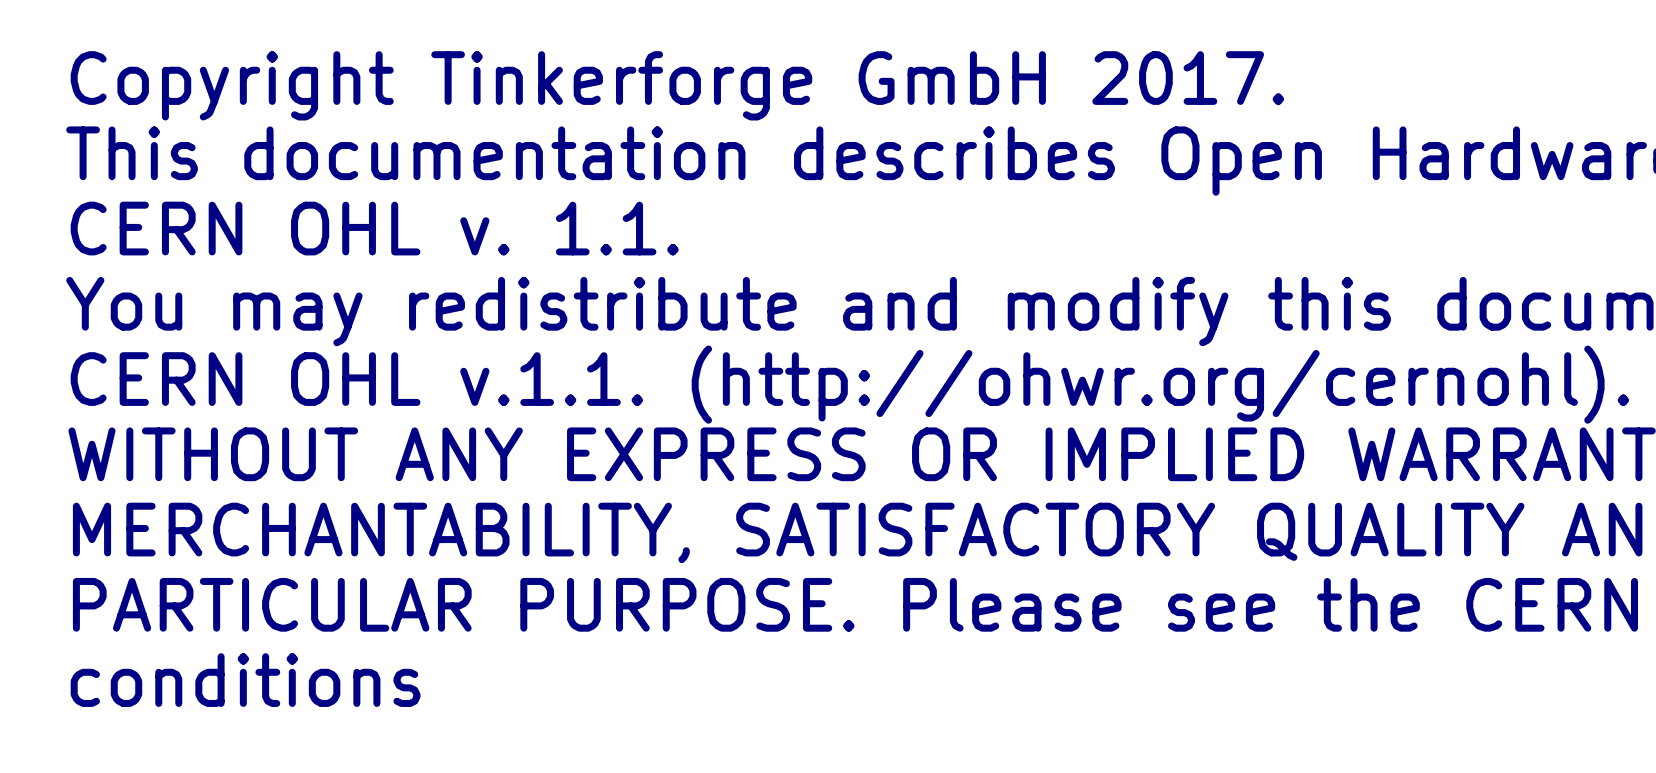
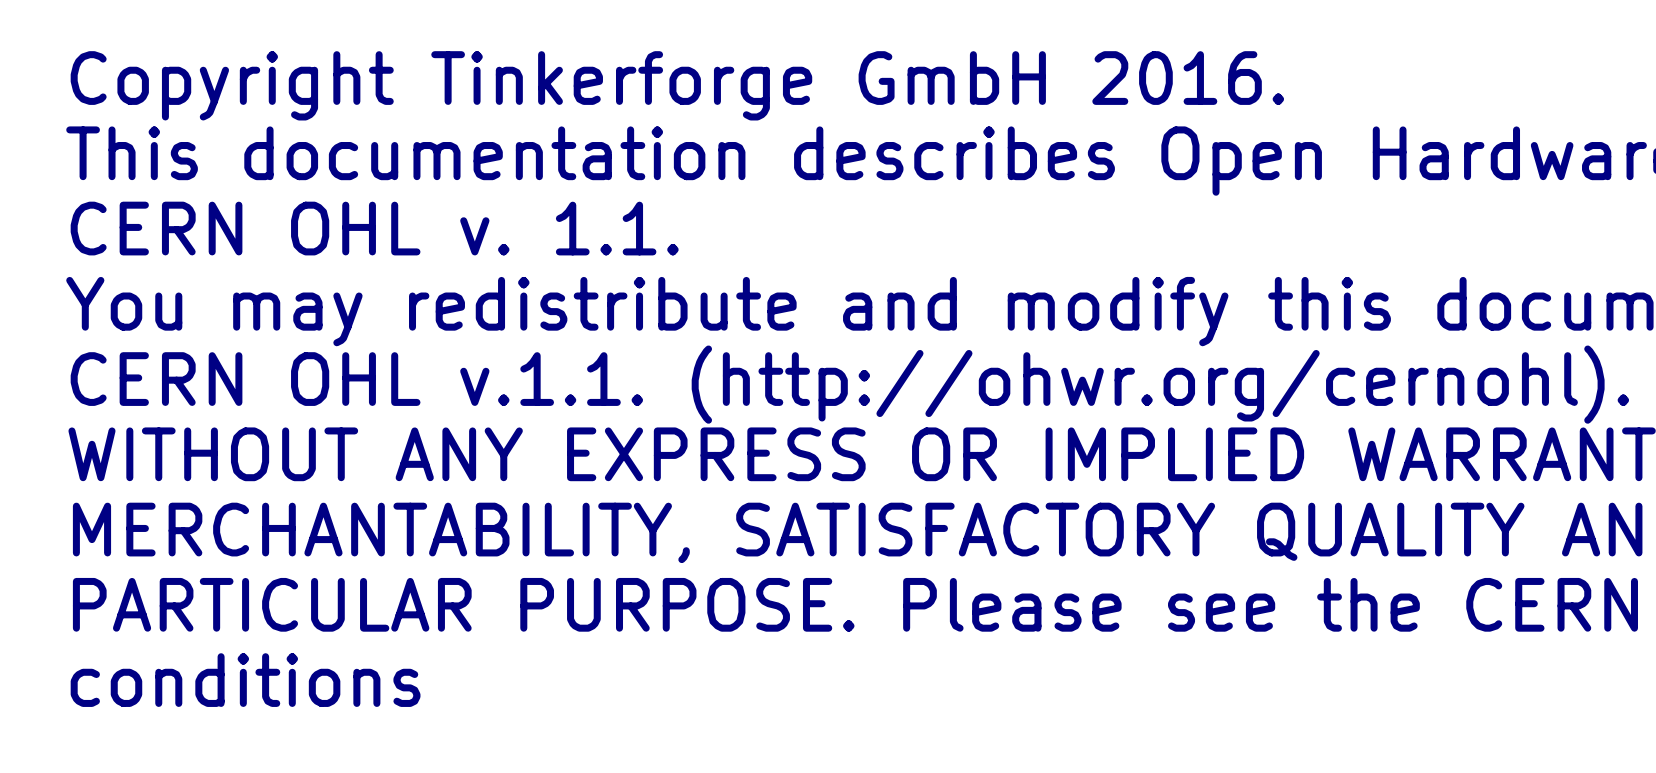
text: Copyright Tinkerforge GmbH 2017. (677, 85) -> Copyright Tinkerforge GmbH 2016. (677, 85)

